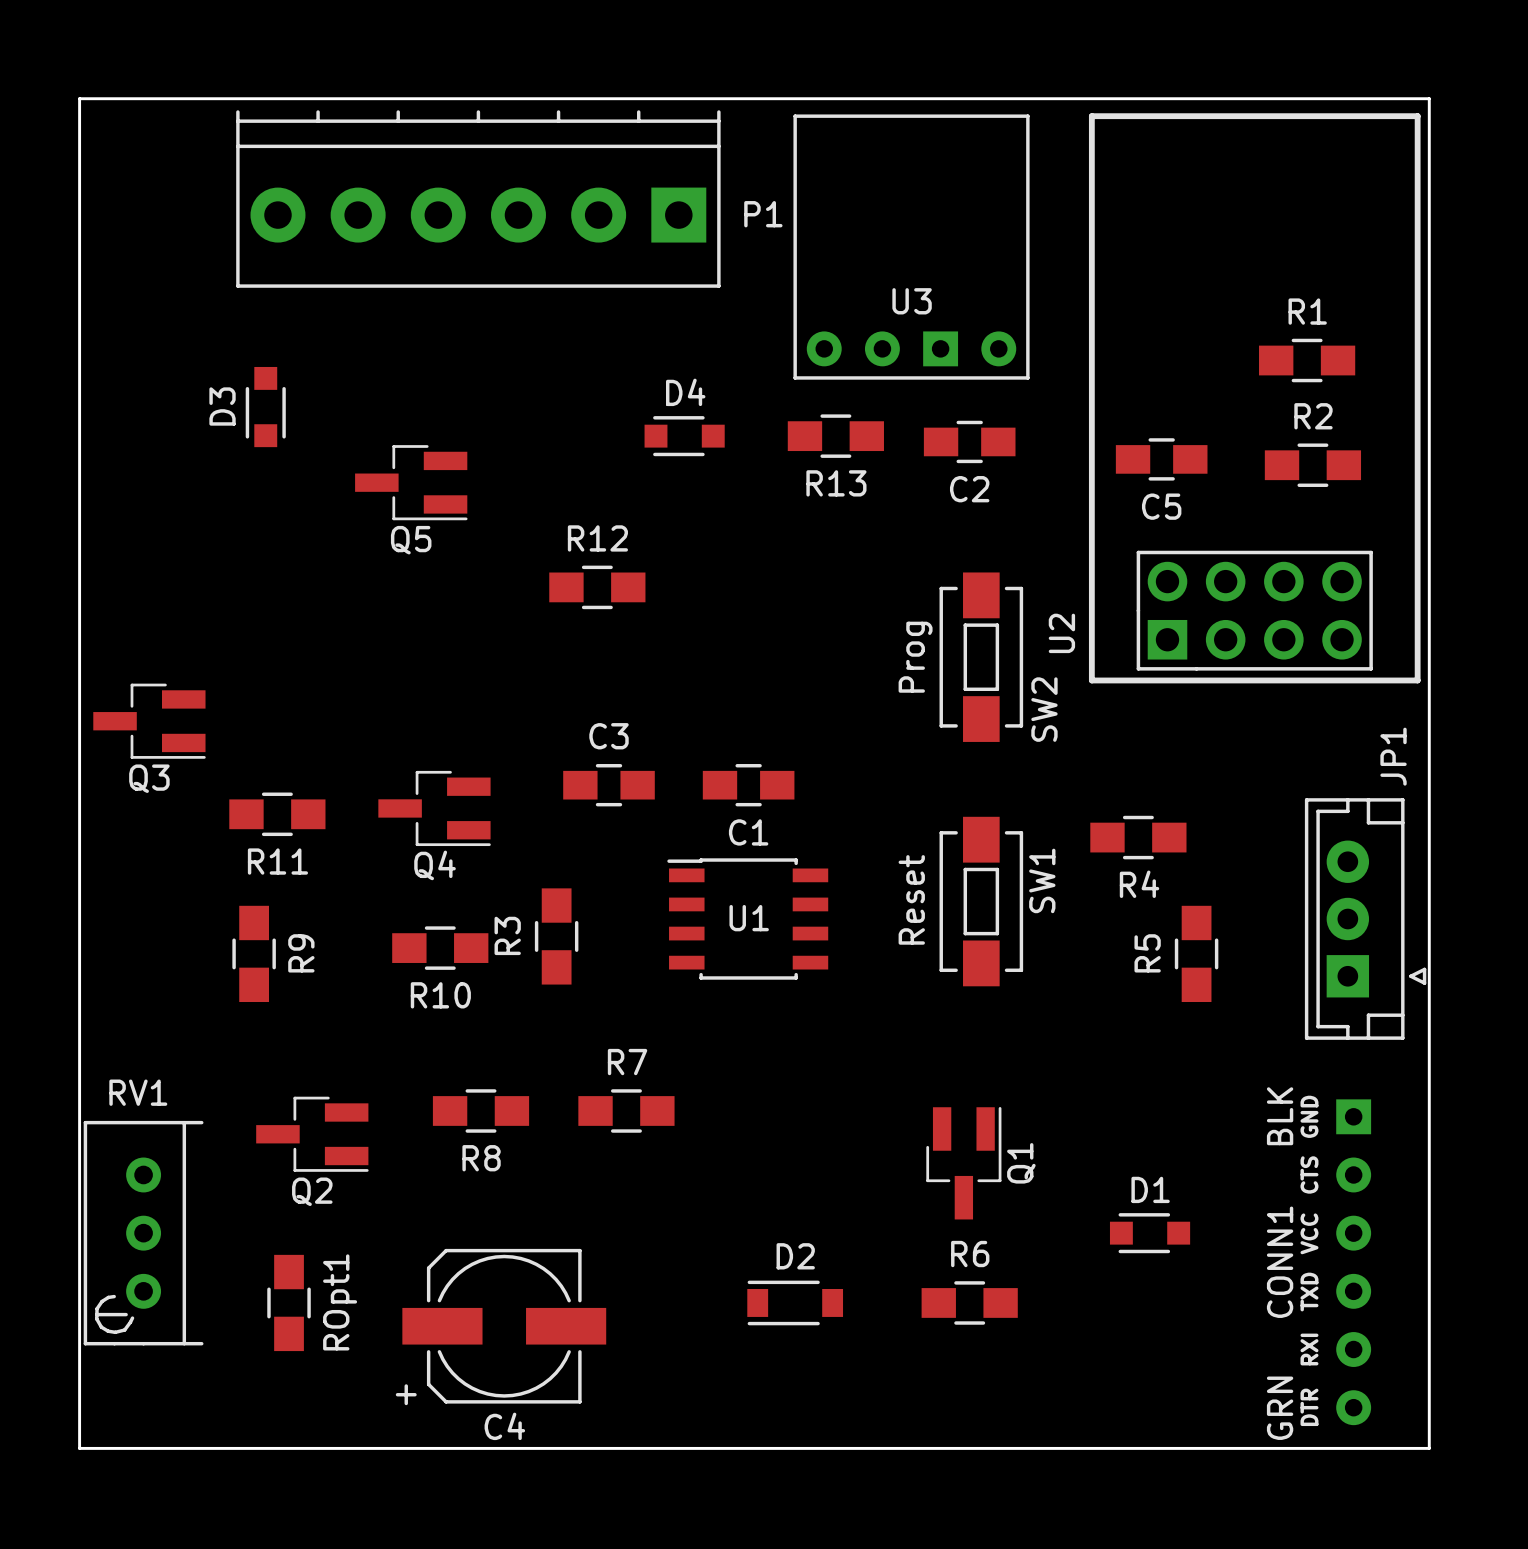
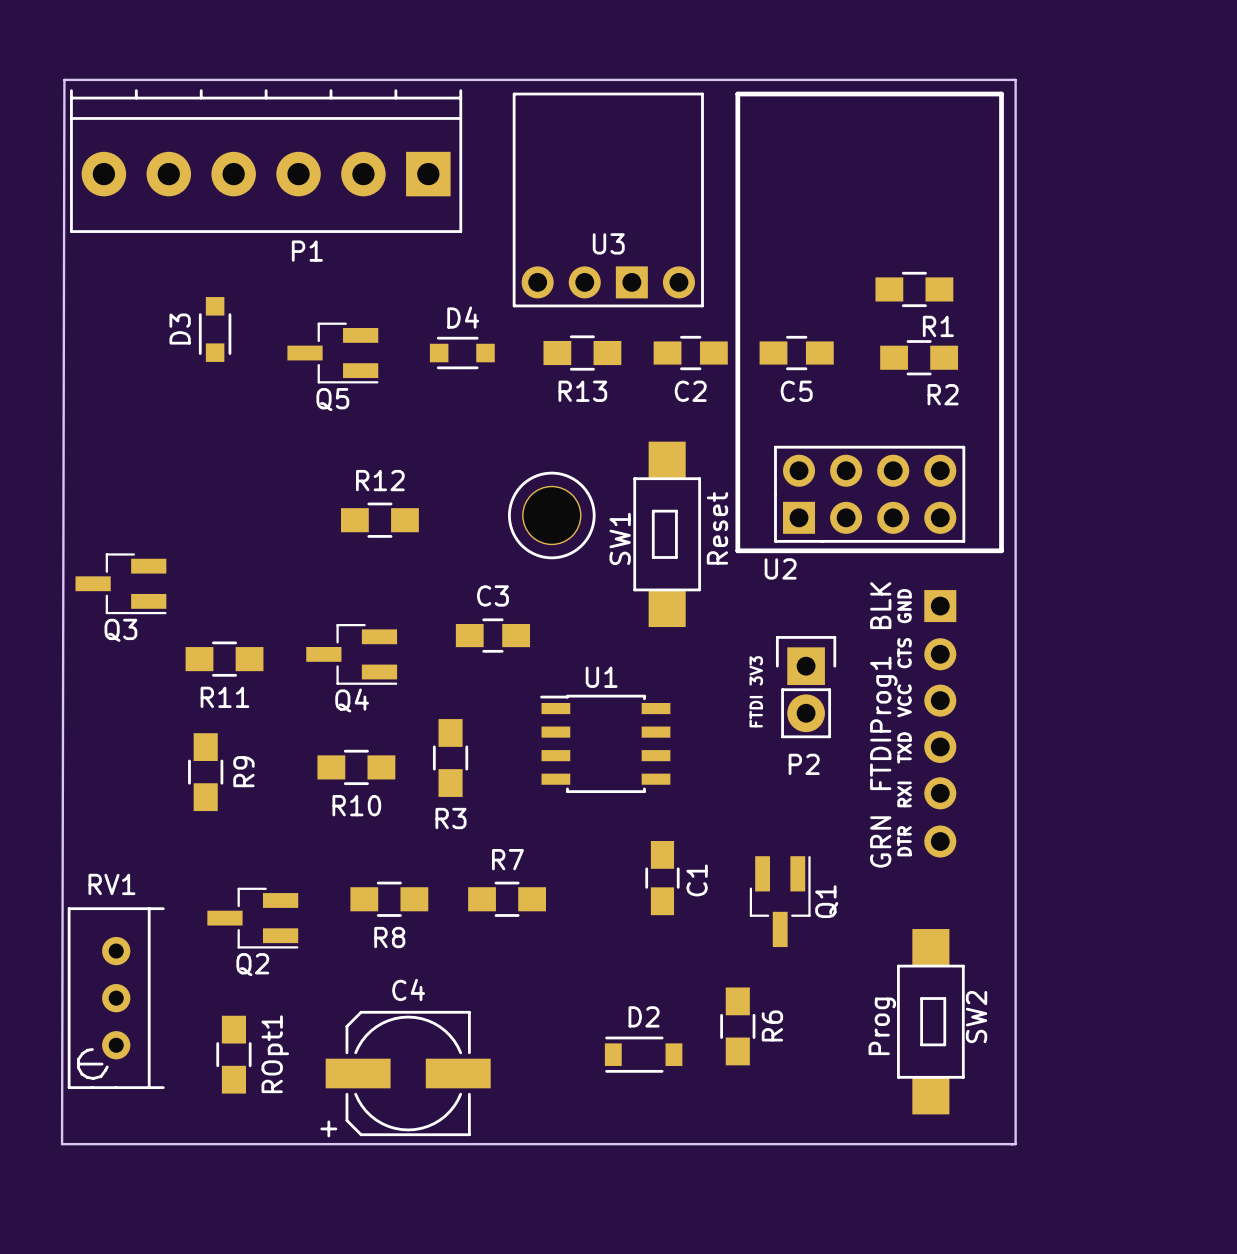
board edge: (79, 98) (79, 1448) (1429, 1448) (1429, 98) (1254, 98) -> (64, 79) (62, 1144) (1015, 1144) (1015, 79)
U3 footprint: [793, 114, 1030, 380] -> [512, 92, 704, 308]
P1 position: (478, 199) -> (266, 161)
P1 name position: P1 (763, 214) -> P1 (307, 251)
R1 name position: R1 (1307, 311) -> R1 (938, 326)
R1 position: (1307, 360) -> (914, 289)
U2 position: (1254, 398) -> (869, 322)
R2 name position: R2 (1313, 416) -> R2 (943, 394)
D4 position: (684, 436) -> (462, 353)
R13 position: (835, 436) -> (582, 353)
C2 position: (969, 441) -> (690, 353)
C5 position: (1161, 459) -> (796, 353)
R2 position: (1312, 465) -> (919, 357)
Q5 position: (411, 482) -> (332, 353)
SW2 footprint: [939, 572, 1024, 742] -> [897, 929, 965, 1115]
R12 position: (597, 587) -> (379, 520)
U2 name rotation: 0° (1061, 633) -> 90° clockwise (780, 568)
U2 name position: U2 (1061, 633) -> U2 (780, 568)
part: none -> (551, 515)
SW2 name position: SW2 (1044, 709) -> SW2 (976, 1017)
C1 rotation: 0° (748, 785) -> 90° clockwise (662, 878)
C1 position: (748, 785) -> (662, 878)
SW1 footprint: [939, 816, 1024, 987] -> [633, 441, 702, 628]
C1 name position: C1 (748, 832) -> C1 (697, 880)
R4: (1138, 837) -> none
P2: none -> (806, 687)
text: none -> FTDI 3V3 (756, 691)
SW1 name position: SW1 (1042, 880) -> SW1 (620, 538)
FTDIProg1: none -> (940, 723)
SW1 value position: Reset (911, 899) -> Reset (717, 528)
U1 name position: U1 (749, 918) -> U1 (601, 677)
JP1: (1365, 919) -> none
R3 name rotation: 0° (507, 935) -> 90° clockwise (451, 818)
R3 name position: R3 (507, 935) -> R3 (451, 818)
R5: (1196, 953) -> none
Q1 position: (963, 1163) -> (780, 901)
D1: (1150, 1233) -> none
CONN1: (1353, 1262) -> none
R6 rotation: 0° (969, 1302) -> 90° clockwise (737, 1026)
R6 position: (969, 1302) -> (737, 1026)
C4 name position: C4 (504, 1426) -> C4 (408, 989)

